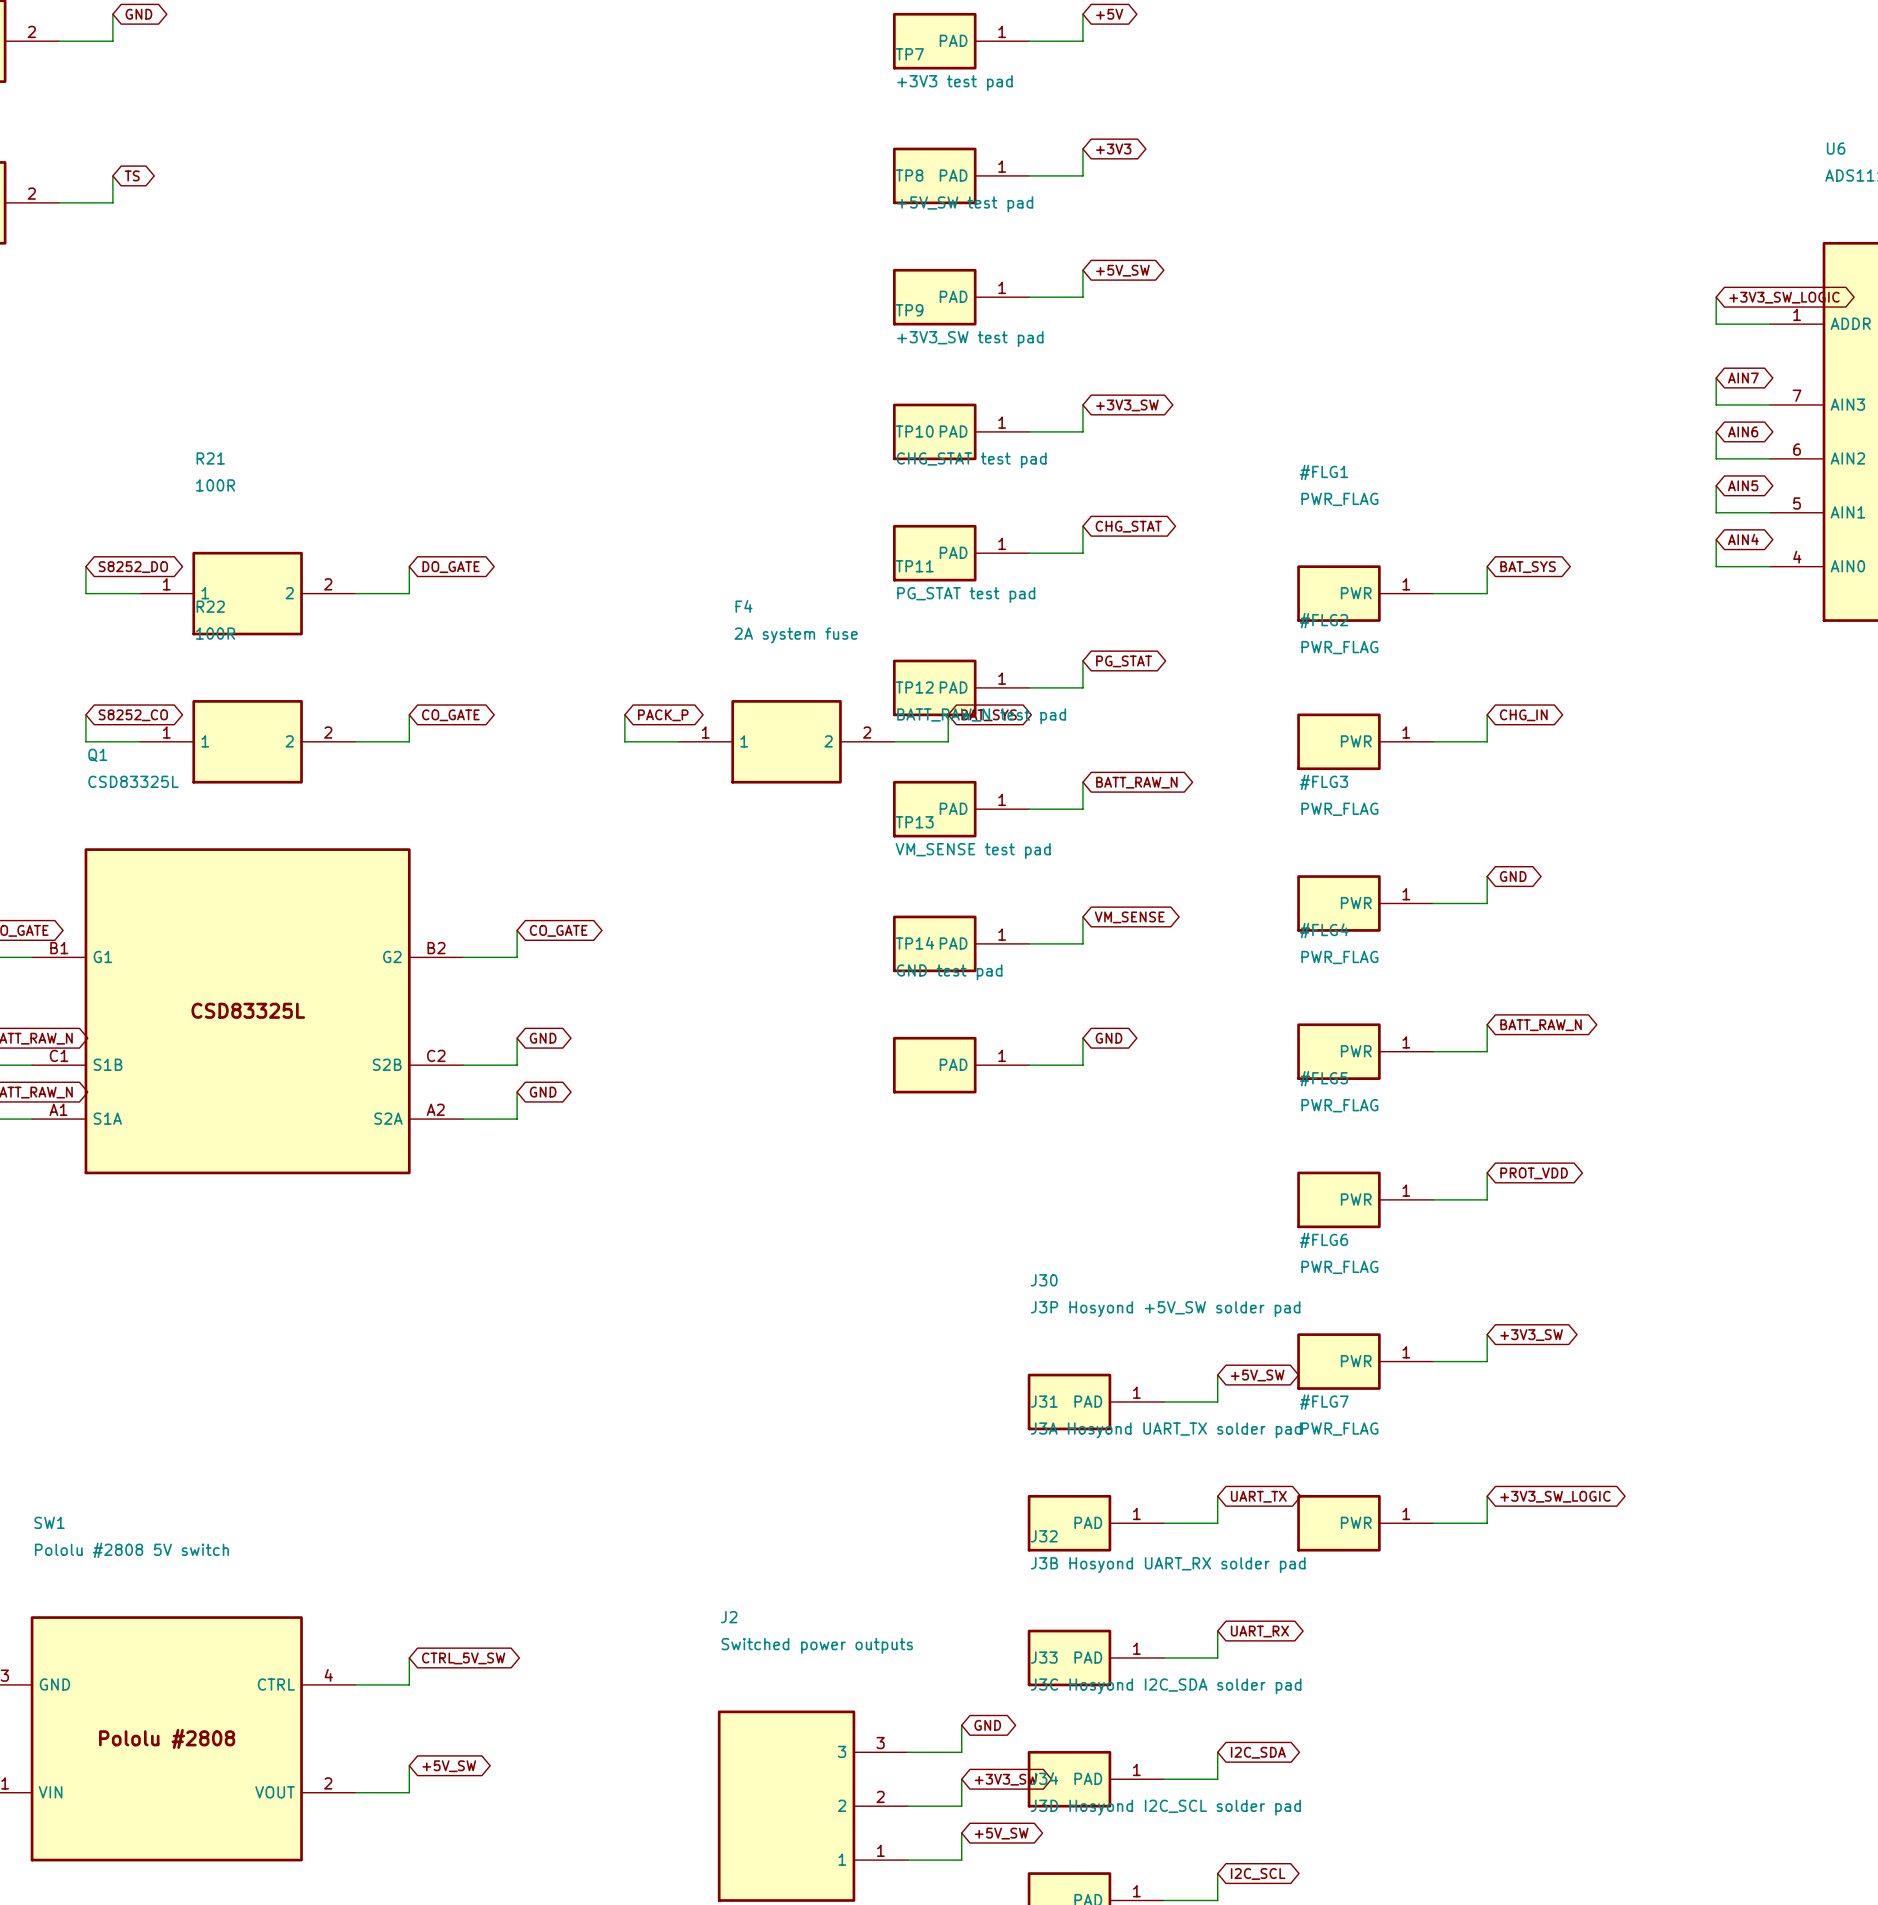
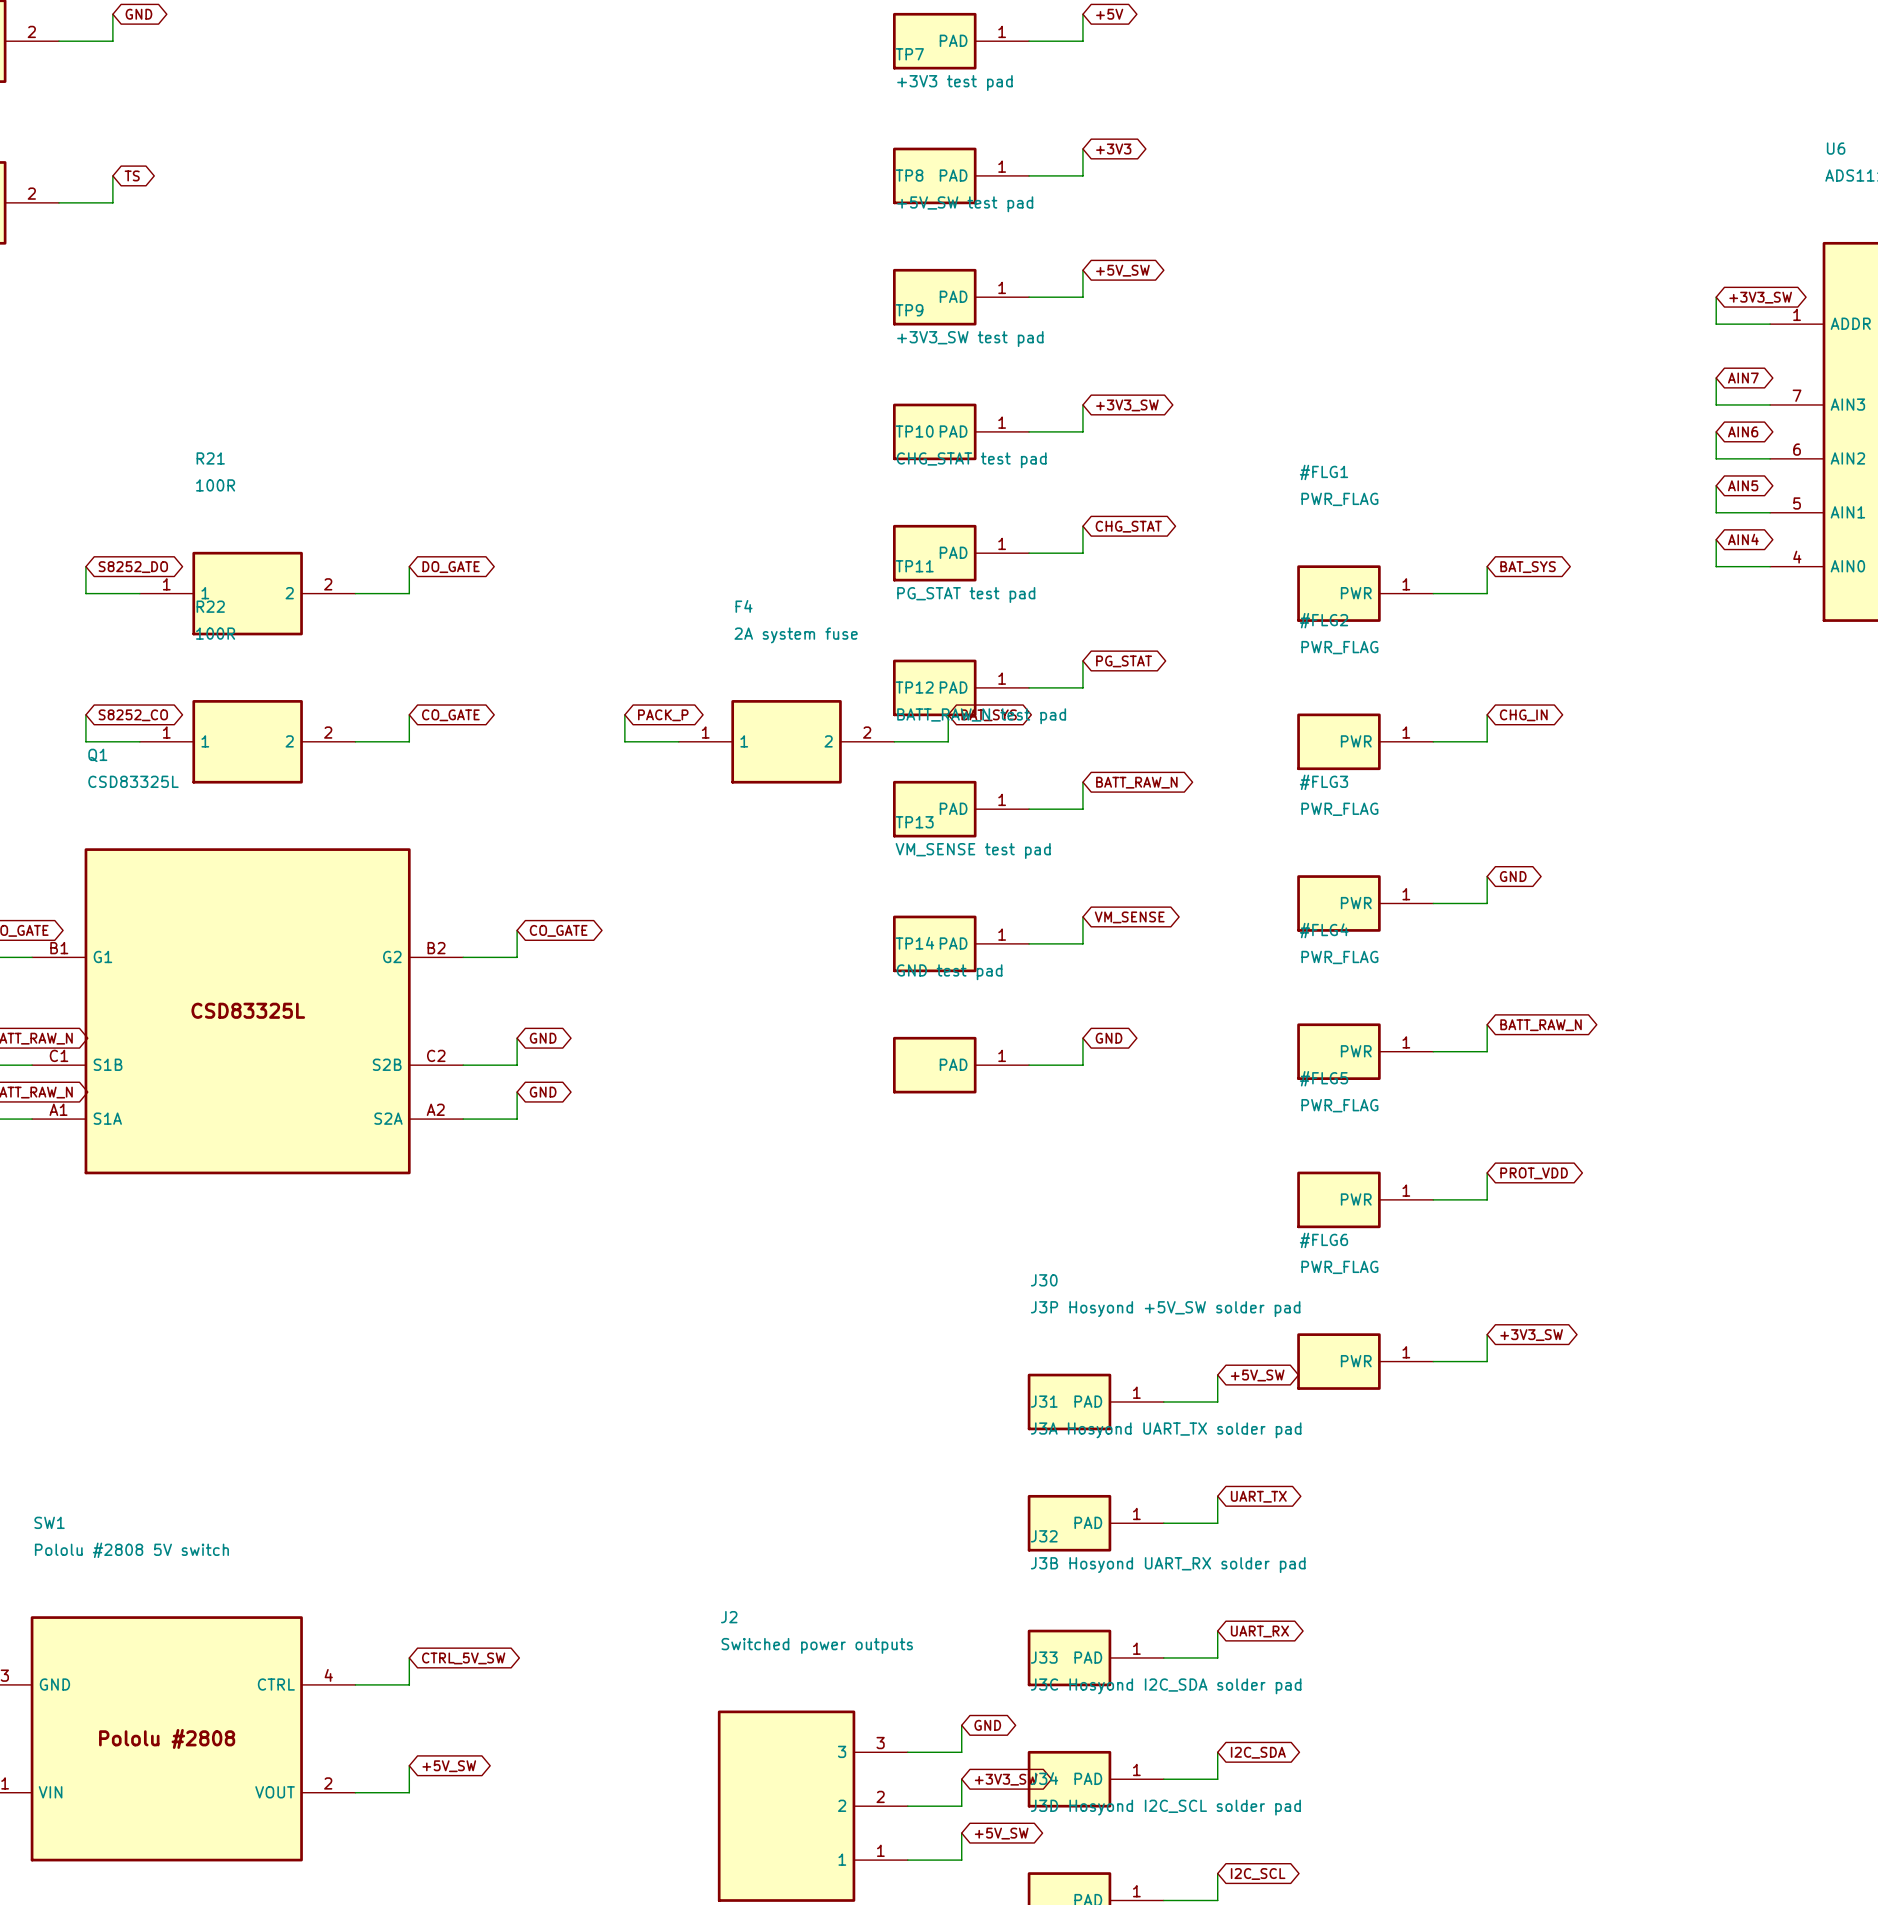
global label: +3V3_SW_LOGIC (1784, 297) -> +3V3_SW (1760, 297)
wire: (1487, 1496) (1487, 1523) (1433, 1523) -> none
global label: +3V3_SW_LOGIC (1555, 1496) -> none
#FLG7: PWR_FLAG (1365, 1523) -> none

